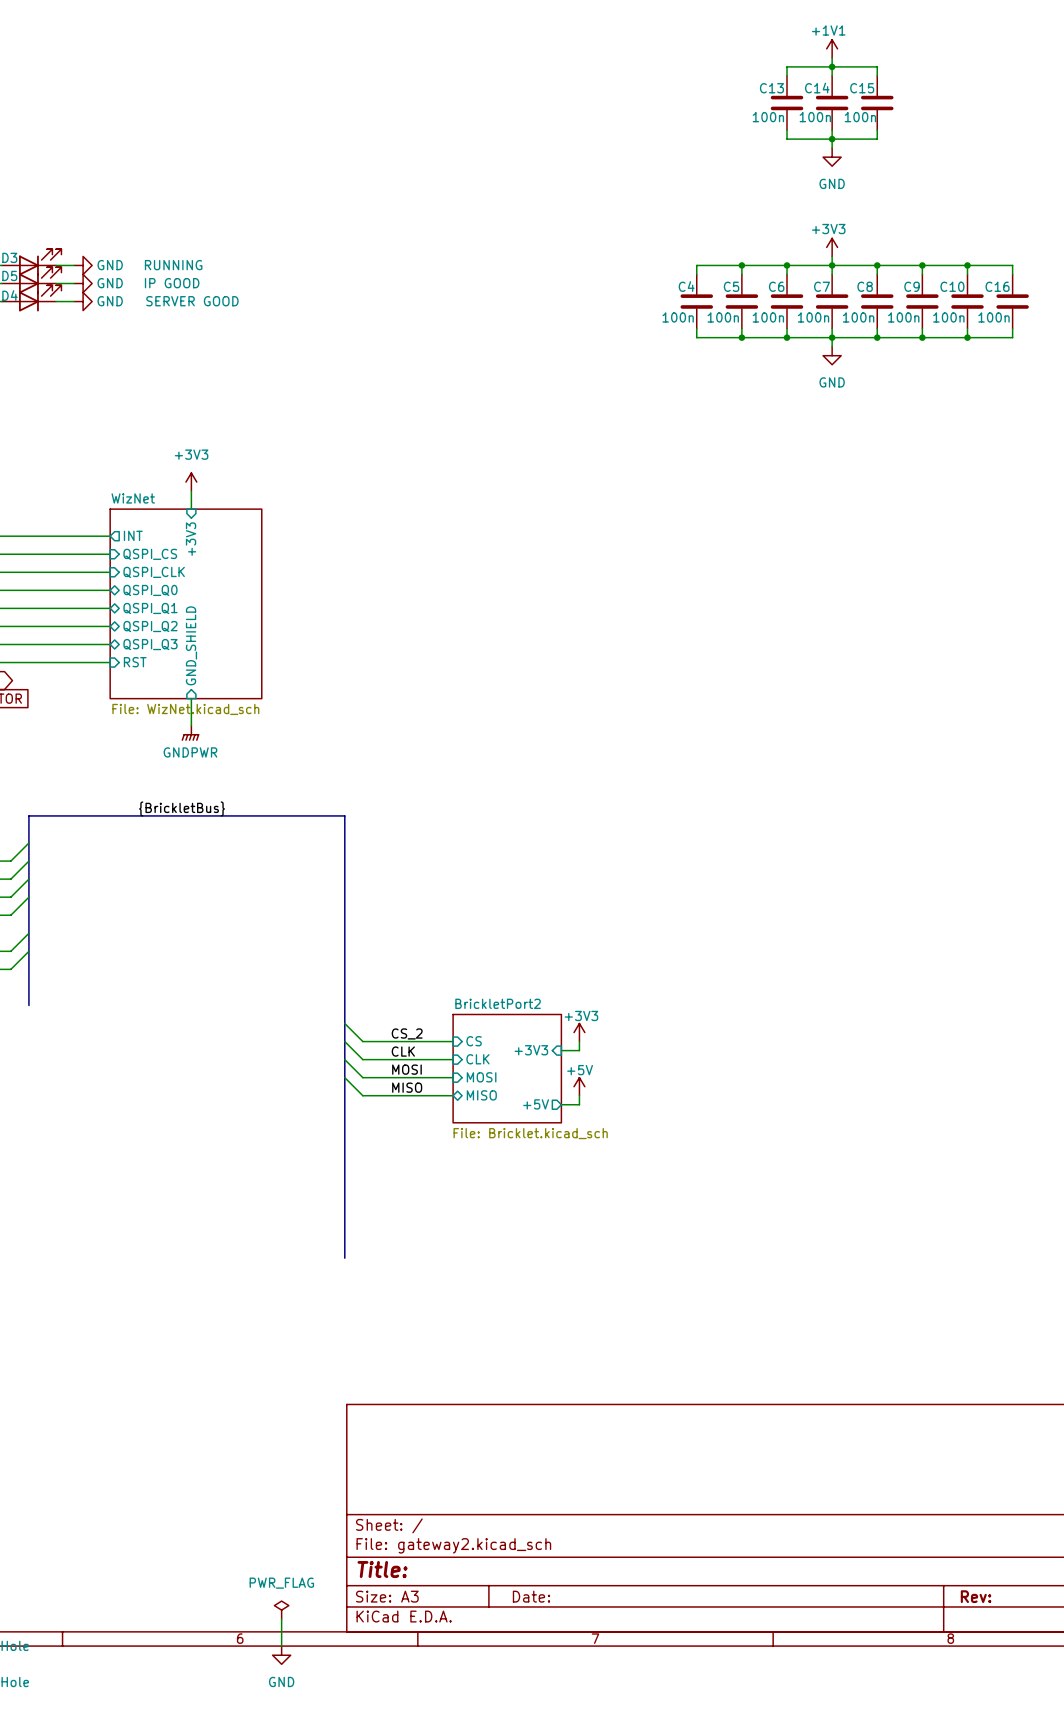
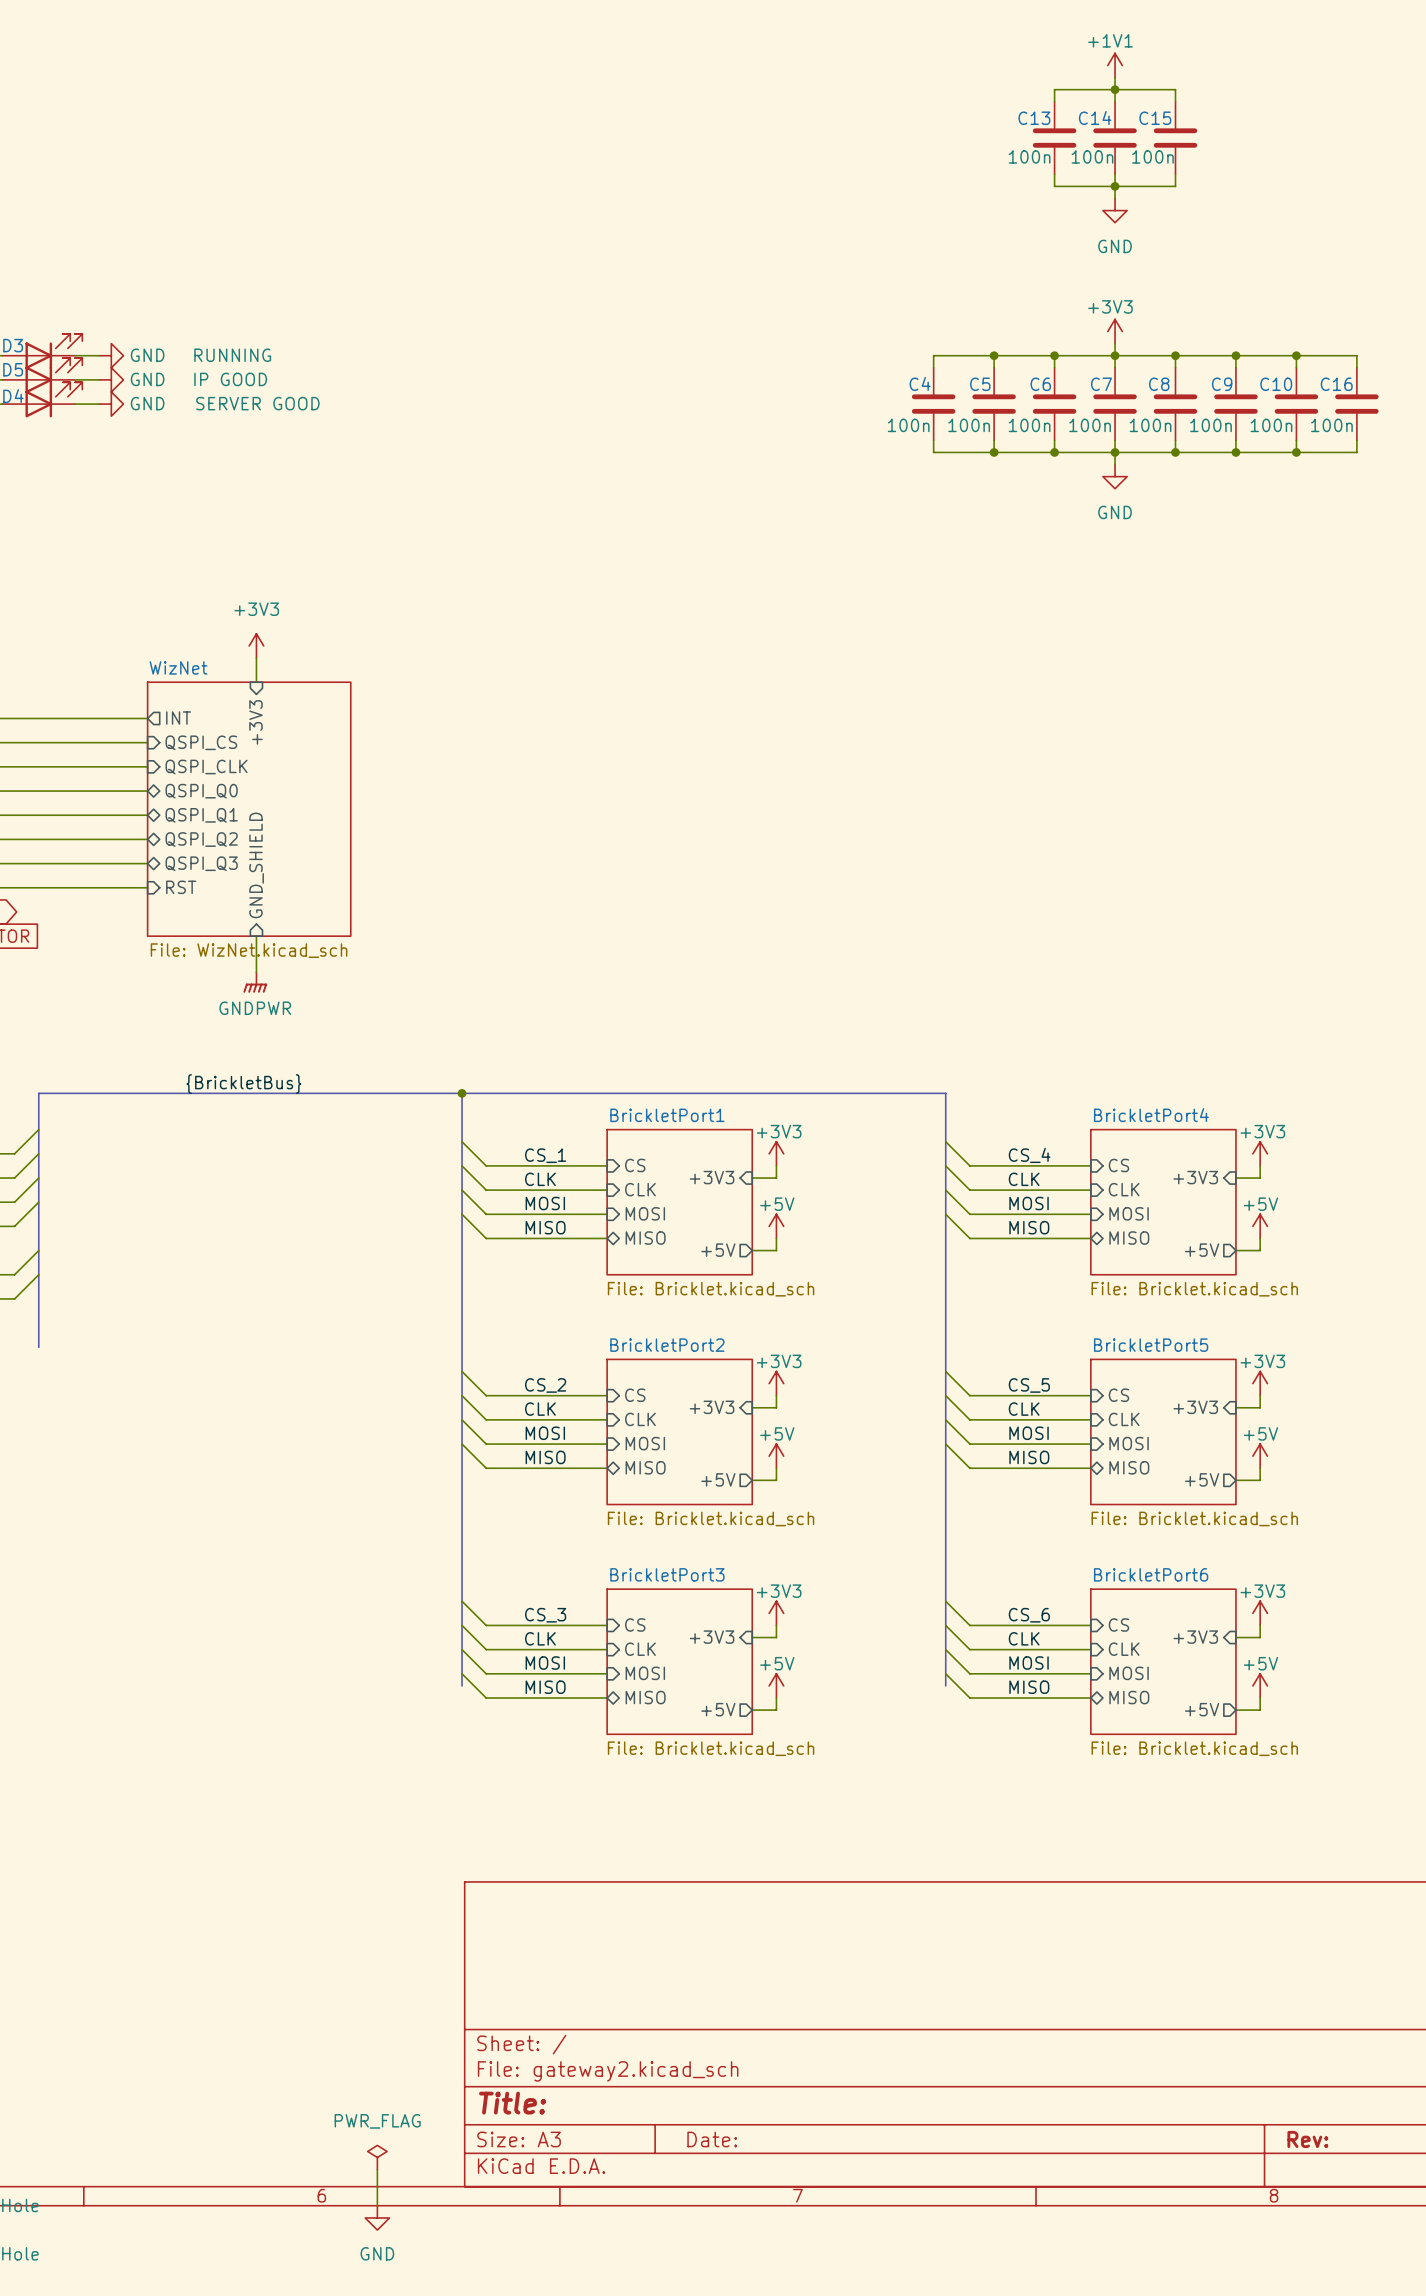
bus: none -> (462, 1093) (945, 1093) (945, 1685)
junction: none -> (462, 1093)
wire: none -> (462, 1141) (486, 1165) (607, 1165)
wire: none -> (945, 1141) (969, 1165) (1090, 1165)
power symbol: none -> +3V3 (776, 1153)
power symbol: none -> +3V3 (1260, 1153)
label: none -> CS_1 (545, 1155)
label: none -> CS_4 (1029, 1155)
sheet pin: none -> CS (635, 1165)
sheet pin: none -> CS (1118, 1165)
wire: none -> (462, 1165) (486, 1190) (607, 1190)
wire: none -> (776, 1165) (776, 1178) (752, 1178)
wire: none -> (945, 1165) (969, 1190) (1090, 1190)
wire: none -> (1260, 1165) (1260, 1178) (1235, 1178)
sheet pin: none -> +3V3 (712, 1177)
sheet pin: none -> +3V3 (1195, 1177)
label: none -> CLK (540, 1179)
label: none -> CLK (1024, 1179)
sheet pin: none -> CLK (640, 1189)
sheet pin: none -> CLK (1124, 1189)
wire: none -> (462, 1190) (486, 1214) (607, 1214)
wire: none -> (945, 1190) (969, 1214) (1090, 1214)
sheet BrickletPort1: none -> File: Bricklet.kicad_sch (679, 1202)
sheet BrickletPort4: none -> File: Bricklet.kicad_sch (1163, 1202)
label: none -> MOSI (545, 1203)
label: none -> MOSI (1029, 1203)
sheet pin: none -> MOSI (645, 1213)
sheet pin: none -> MOSI (1129, 1213)
wire: none -> (462, 1214) (486, 1238) (607, 1238)
wire: none -> (945, 1214) (969, 1238) (1090, 1238)
power symbol: none -> +5V (776, 1226)
power symbol: none -> +5V (1260, 1226)
label: none -> MISO (545, 1227)
label: none -> MISO (1029, 1227)
sheet pin: none -> MISO (645, 1238)
sheet pin: none -> MISO (1129, 1238)
wire: none -> (776, 1238) (776, 1250) (752, 1250)
wire: none -> (1260, 1238) (1260, 1250) (1235, 1250)
sheet pin: none -> +5V (718, 1250)
sheet pin: none -> +5V (1202, 1250)
wire: none -> (945, 1371) (969, 1395) (1090, 1395)
power symbol: none -> +3V3 (1260, 1383)
label: none -> CS_5 (1029, 1385)
wire: none -> (945, 1395) (969, 1419) (1090, 1419)
sheet pin: none -> CS (1118, 1395)
wire: none -> (1260, 1395) (1260, 1407) (1235, 1407)
sheet pin: none -> +3V3 (1195, 1407)
label: none -> CLK (1024, 1409)
wire: none -> (945, 1419) (969, 1444) (1090, 1444)
sheet pin: none -> CLK (1124, 1419)
sheet BrickletPort5: none -> File: Bricklet.kicad_sch (1163, 1431)
label: none -> MOSI (1029, 1433)
wire: none -> (945, 1444) (969, 1468) (1090, 1468)
sheet pin: none -> MOSI (1129, 1443)
power symbol: none -> +5V (1260, 1456)
label: none -> MISO (1029, 1457)
sheet pin: none -> MISO (1129, 1467)
wire: none -> (1260, 1468) (1260, 1480) (1235, 1480)
sheet pin: none -> +5V (1202, 1479)
wire: none -> (462, 1601) (486, 1625) (607, 1625)
wire: none -> (945, 1601) (969, 1625) (1090, 1625)
power symbol: none -> +3V3 (776, 1613)
power symbol: none -> +3V3 (1260, 1613)
label: none -> CS_3 (545, 1615)
label: none -> CS_6 (1029, 1615)
sheet pin: none -> CS (635, 1624)
sheet pin: none -> CS (1118, 1624)
wire: none -> (462, 1625) (486, 1649) (607, 1649)
wire: none -> (776, 1625) (776, 1637) (752, 1637)
wire: none -> (945, 1625) (969, 1649) (1090, 1649)
wire: none -> (1260, 1625) (1260, 1637) (1235, 1637)
sheet pin: none -> +3V3 (712, 1637)
sheet pin: none -> +3V3 (1195, 1637)
label: none -> CLK (540, 1638)
label: none -> CLK (1024, 1638)
sheet pin: none -> CLK (640, 1649)
sheet pin: none -> CLK (1124, 1649)
wire: none -> (462, 1649) (486, 1673) (607, 1673)
wire: none -> (945, 1649) (969, 1673) (1090, 1673)
sheet BrickletPort3: none -> File: Bricklet.kicad_sch (679, 1661)
sheet BrickletPort6: none -> File: Bricklet.kicad_sch (1163, 1661)
label: none -> MOSI (545, 1663)
label: none -> MOSI (1029, 1663)
sheet pin: none -> MOSI (645, 1673)
sheet pin: none -> MOSI (1129, 1673)
wire: none -> (462, 1673) (486, 1698) (607, 1698)
wire: none -> (945, 1673) (969, 1698) (1090, 1698)
power symbol: none -> +5V (776, 1685)
power symbol: none -> +5V (1260, 1685)
label: none -> MISO (545, 1687)
label: none -> MISO (1029, 1687)
sheet pin: none -> MISO (645, 1697)
sheet pin: none -> MISO (1129, 1697)
wire: none -> (776, 1698) (776, 1710) (752, 1710)
wire: none -> (1260, 1698) (1260, 1710) (1235, 1710)
sheet pin: none -> +5V (718, 1709)
sheet pin: none -> +5V (1202, 1709)

